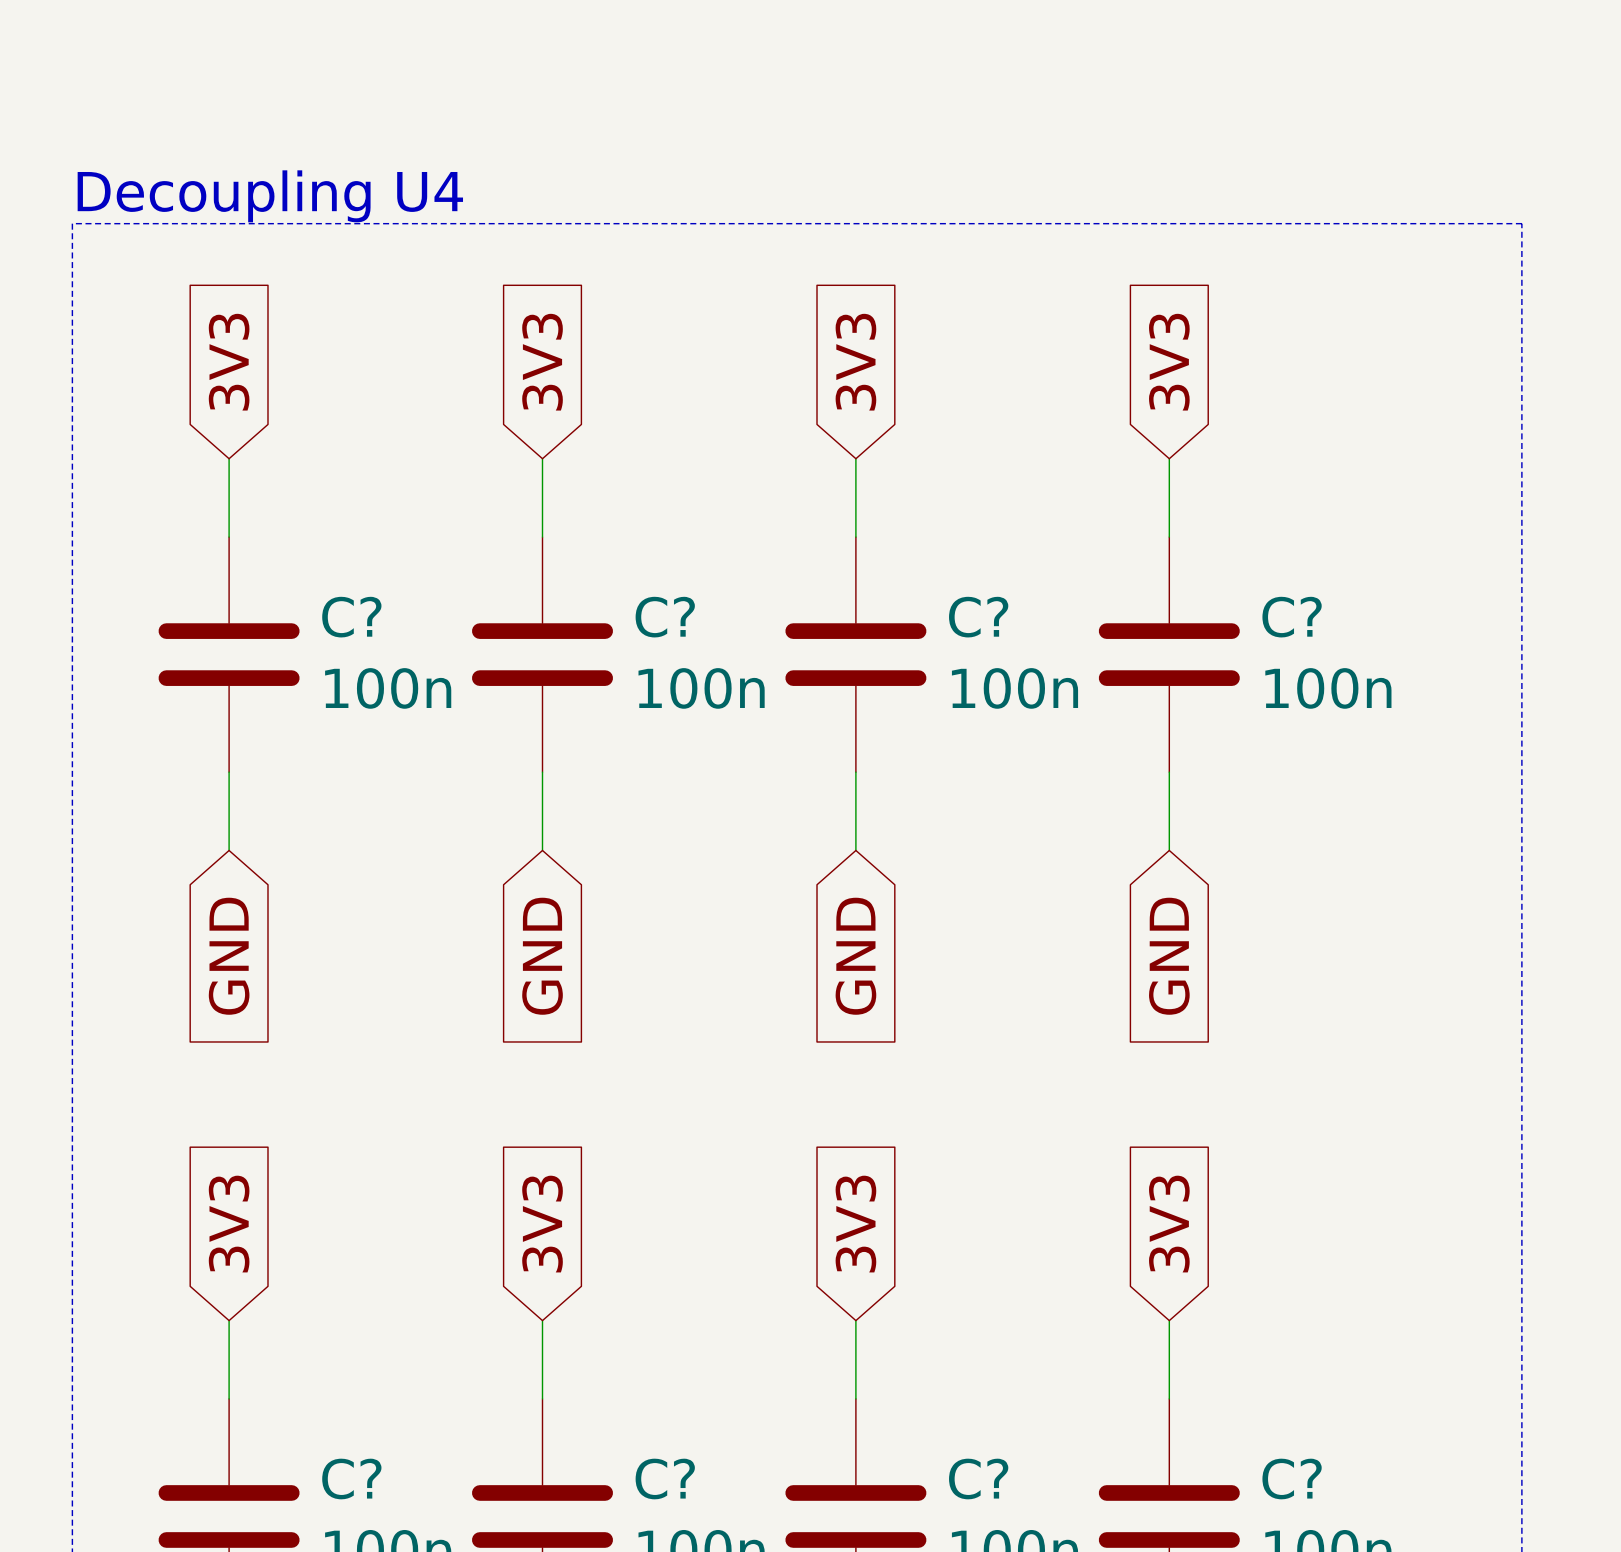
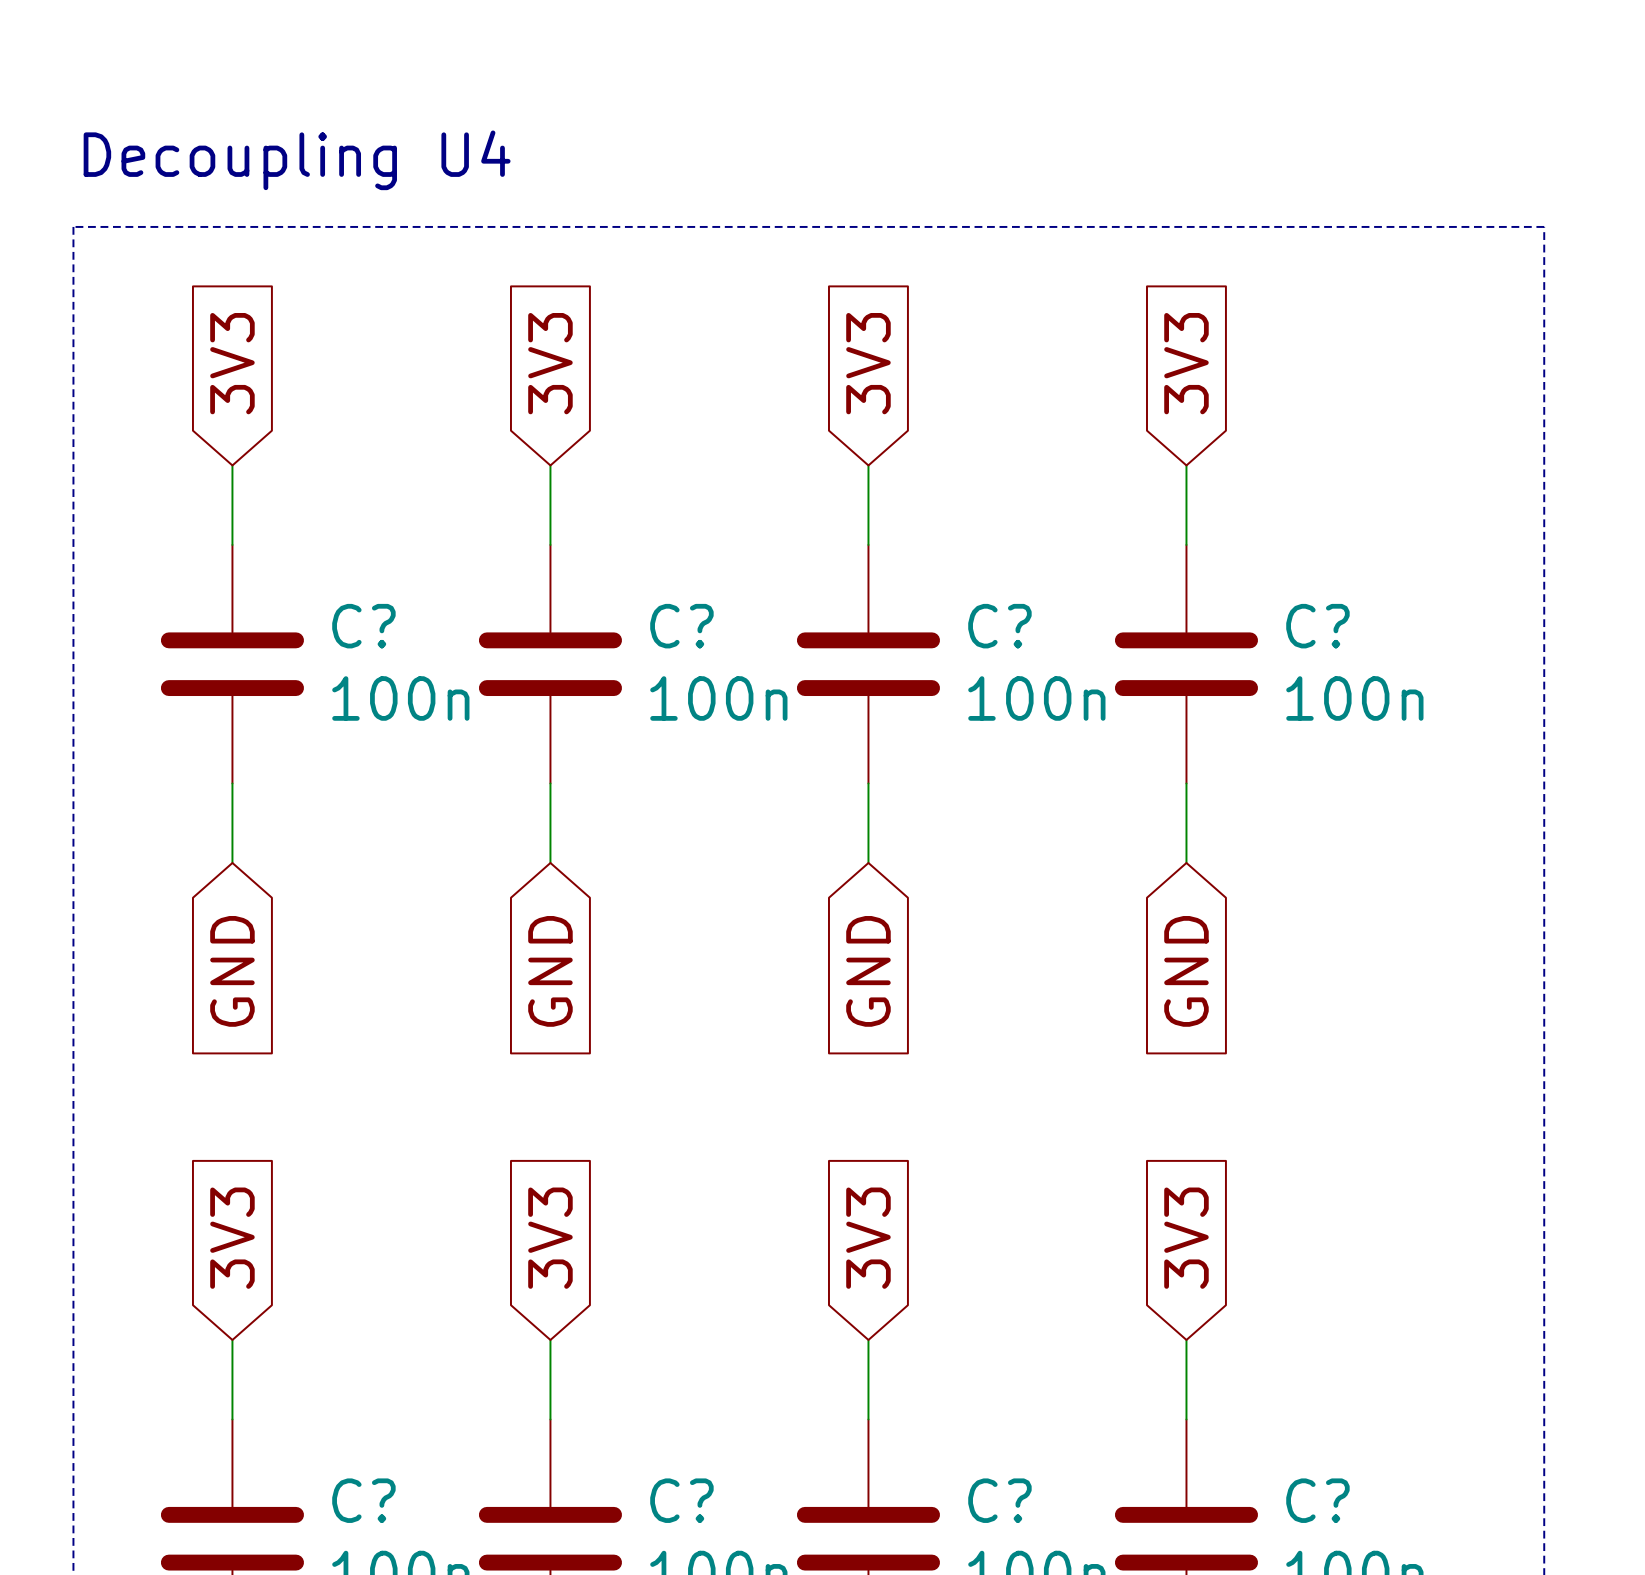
text position: Decoupling U4 (270, 196) -> Decoupling U4 (297, 160)

